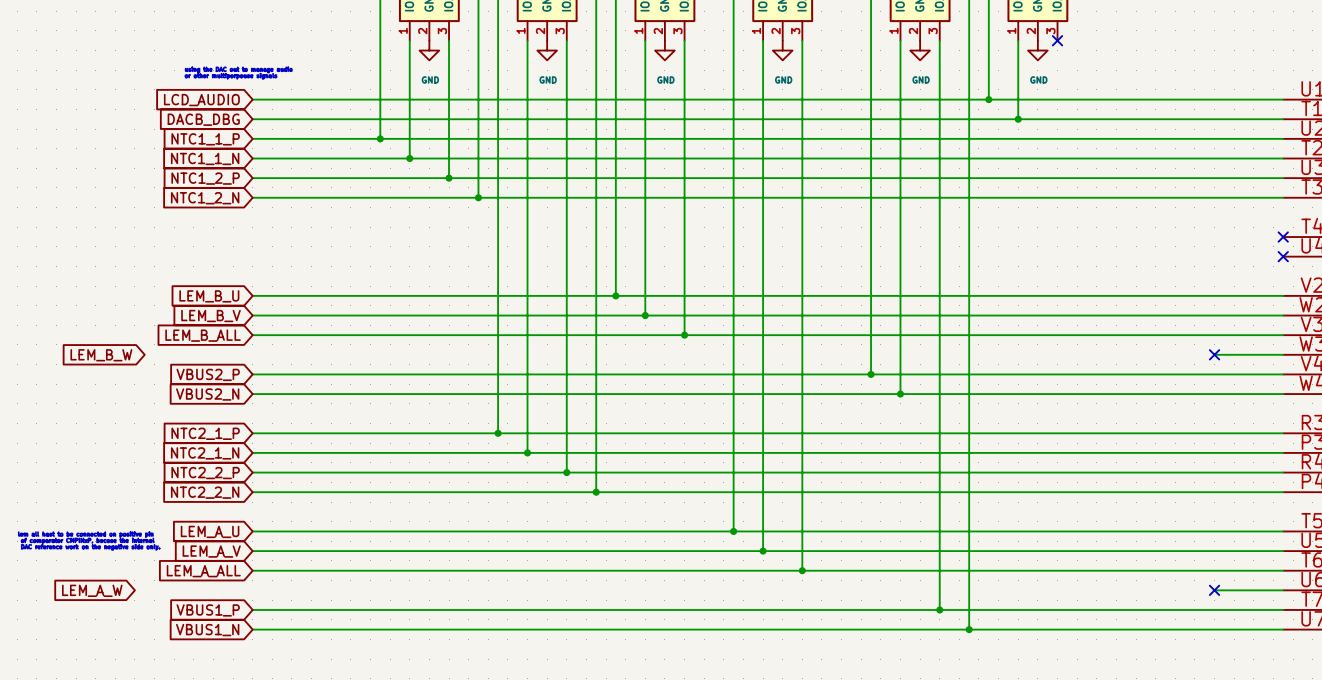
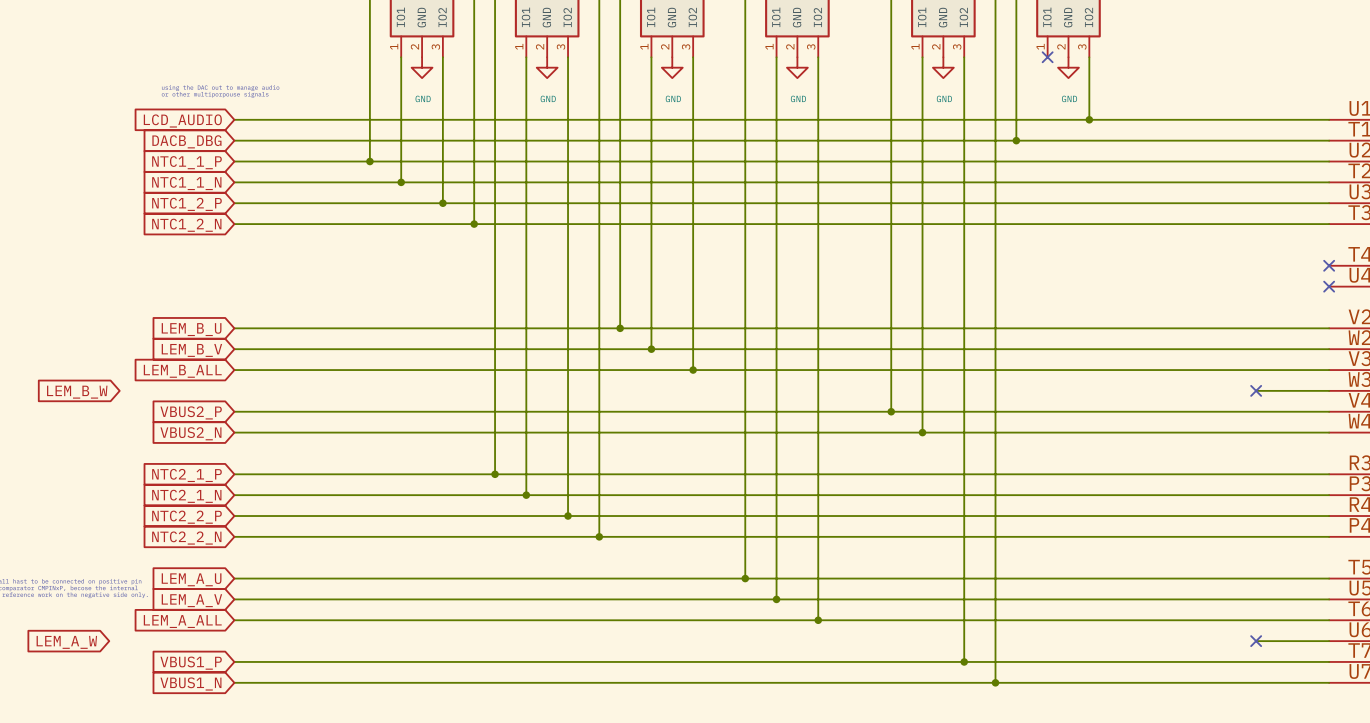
wire: (1018, 40) (1018, 119) -> none
wire: none -> (1089, 57) (1089, 119)
no-connect mark position: (1057, 40) -> (1047, 57)
wire: none -> (1016, 119) (1016, 140)
junction: (988, 99) -> none
junction: none -> (1089, 119)
junction: none -> (1016, 140)
junction: (1018, 119) -> none

